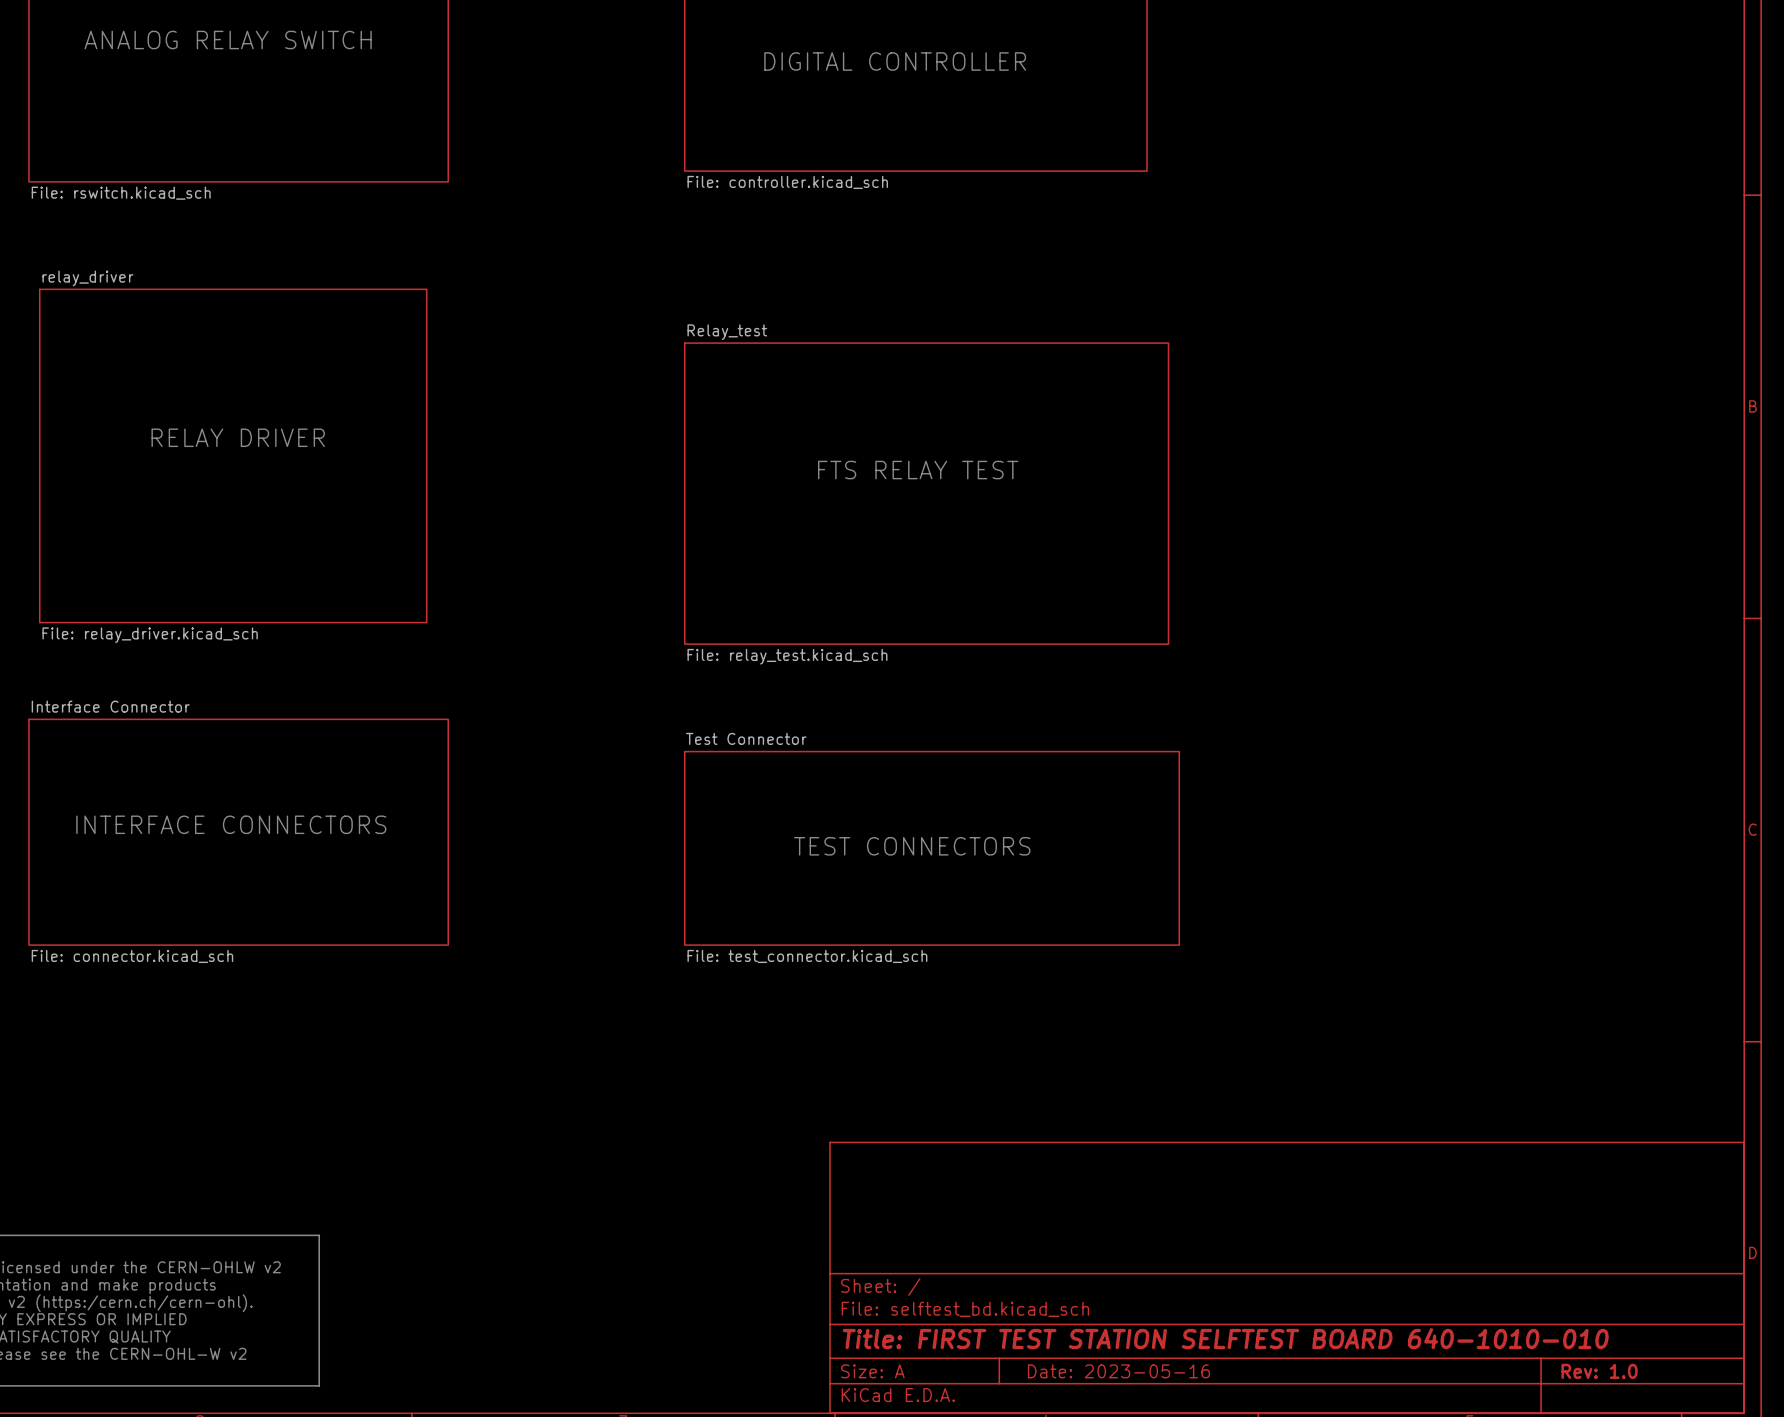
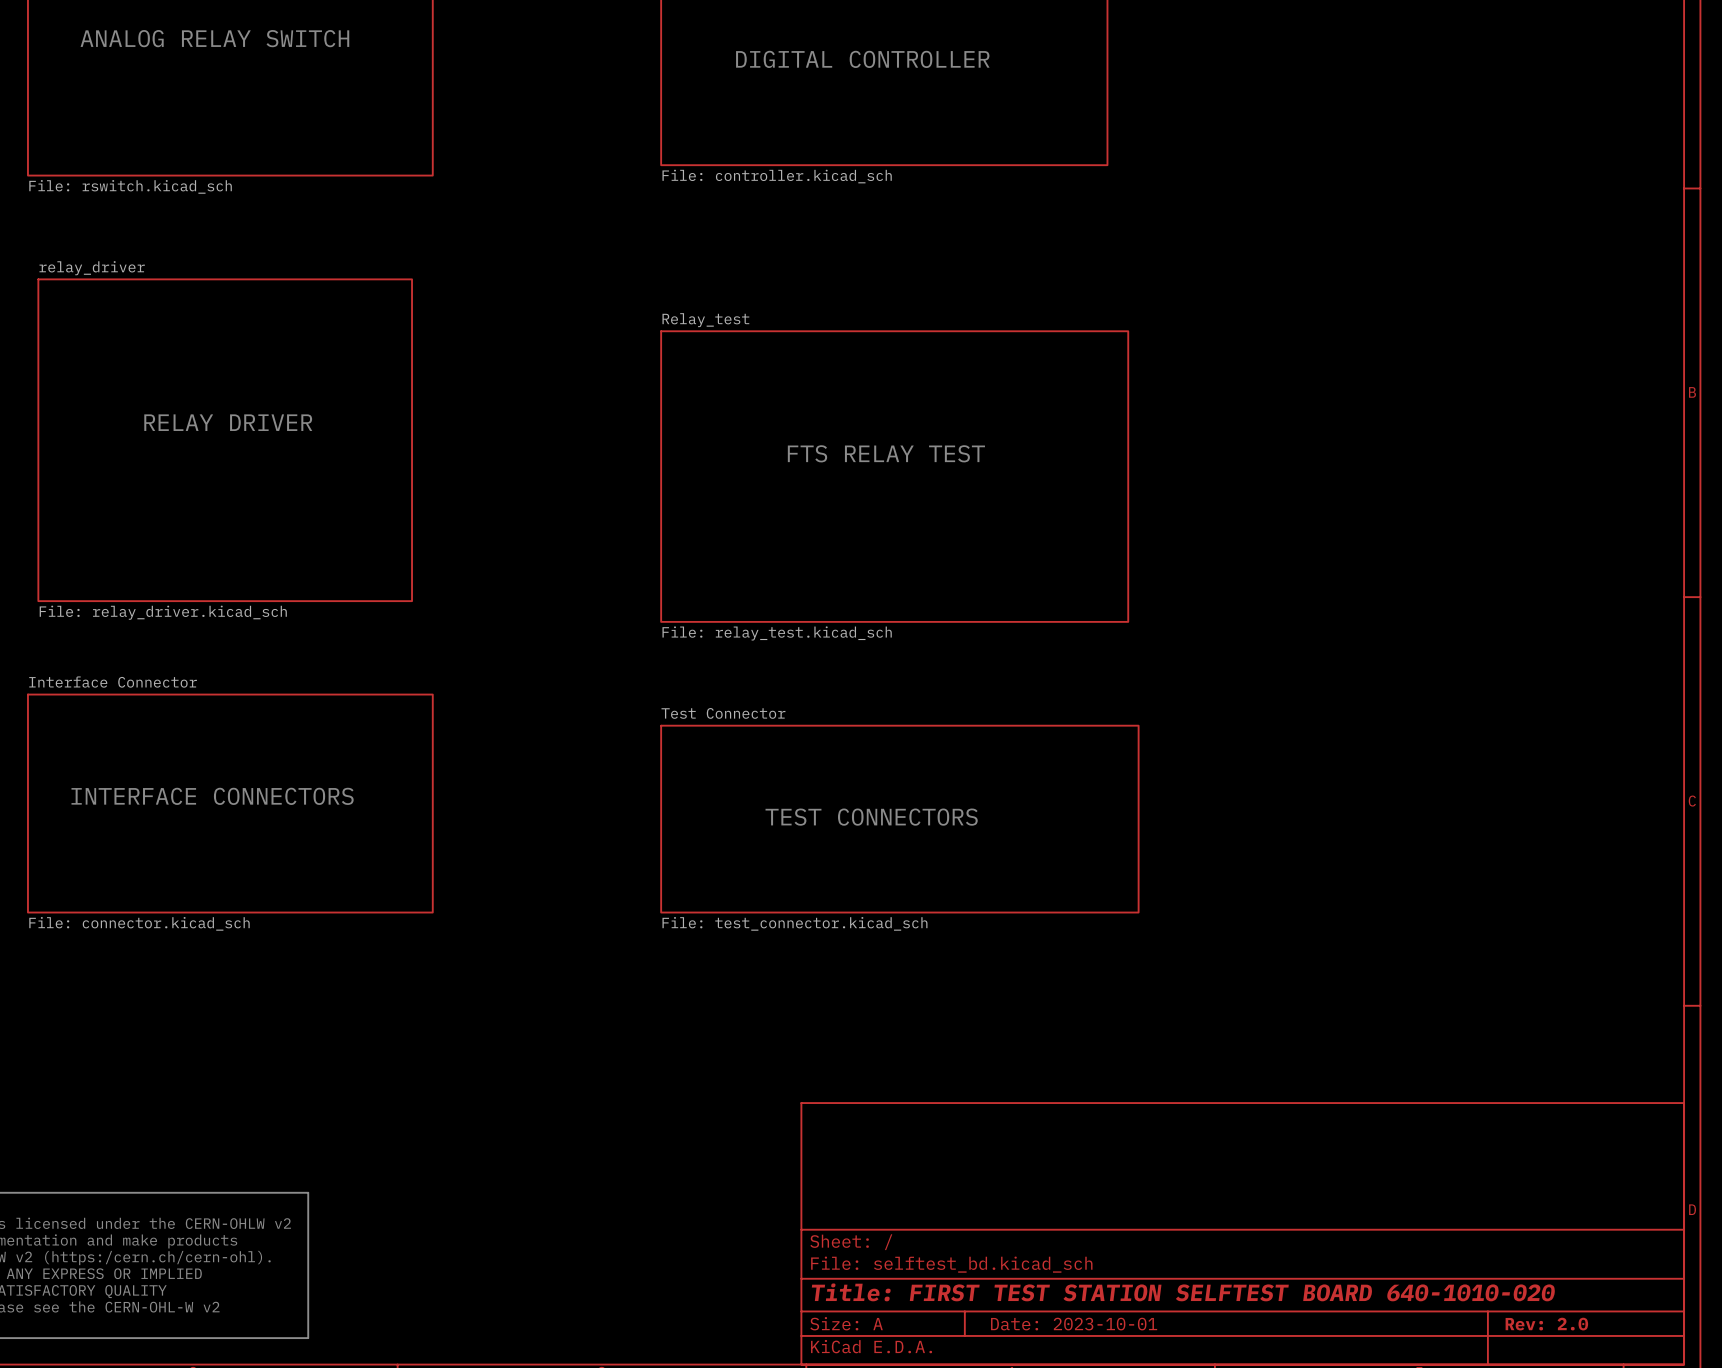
title block: Title: FIRST TEST STATION SELFTEST BOARD 640-1010-010 (1225, 1338) -> Title: FIRST TEST STATION SELFTEST BOARD 640-1010-020 (1183, 1292)
title block: Date: 2023-05-16 (1118, 1371) -> Date: 2023-10-01 (1074, 1324)
title block: Rev: 1.0 (1599, 1371) -> Rev: 2.0 (1546, 1324)

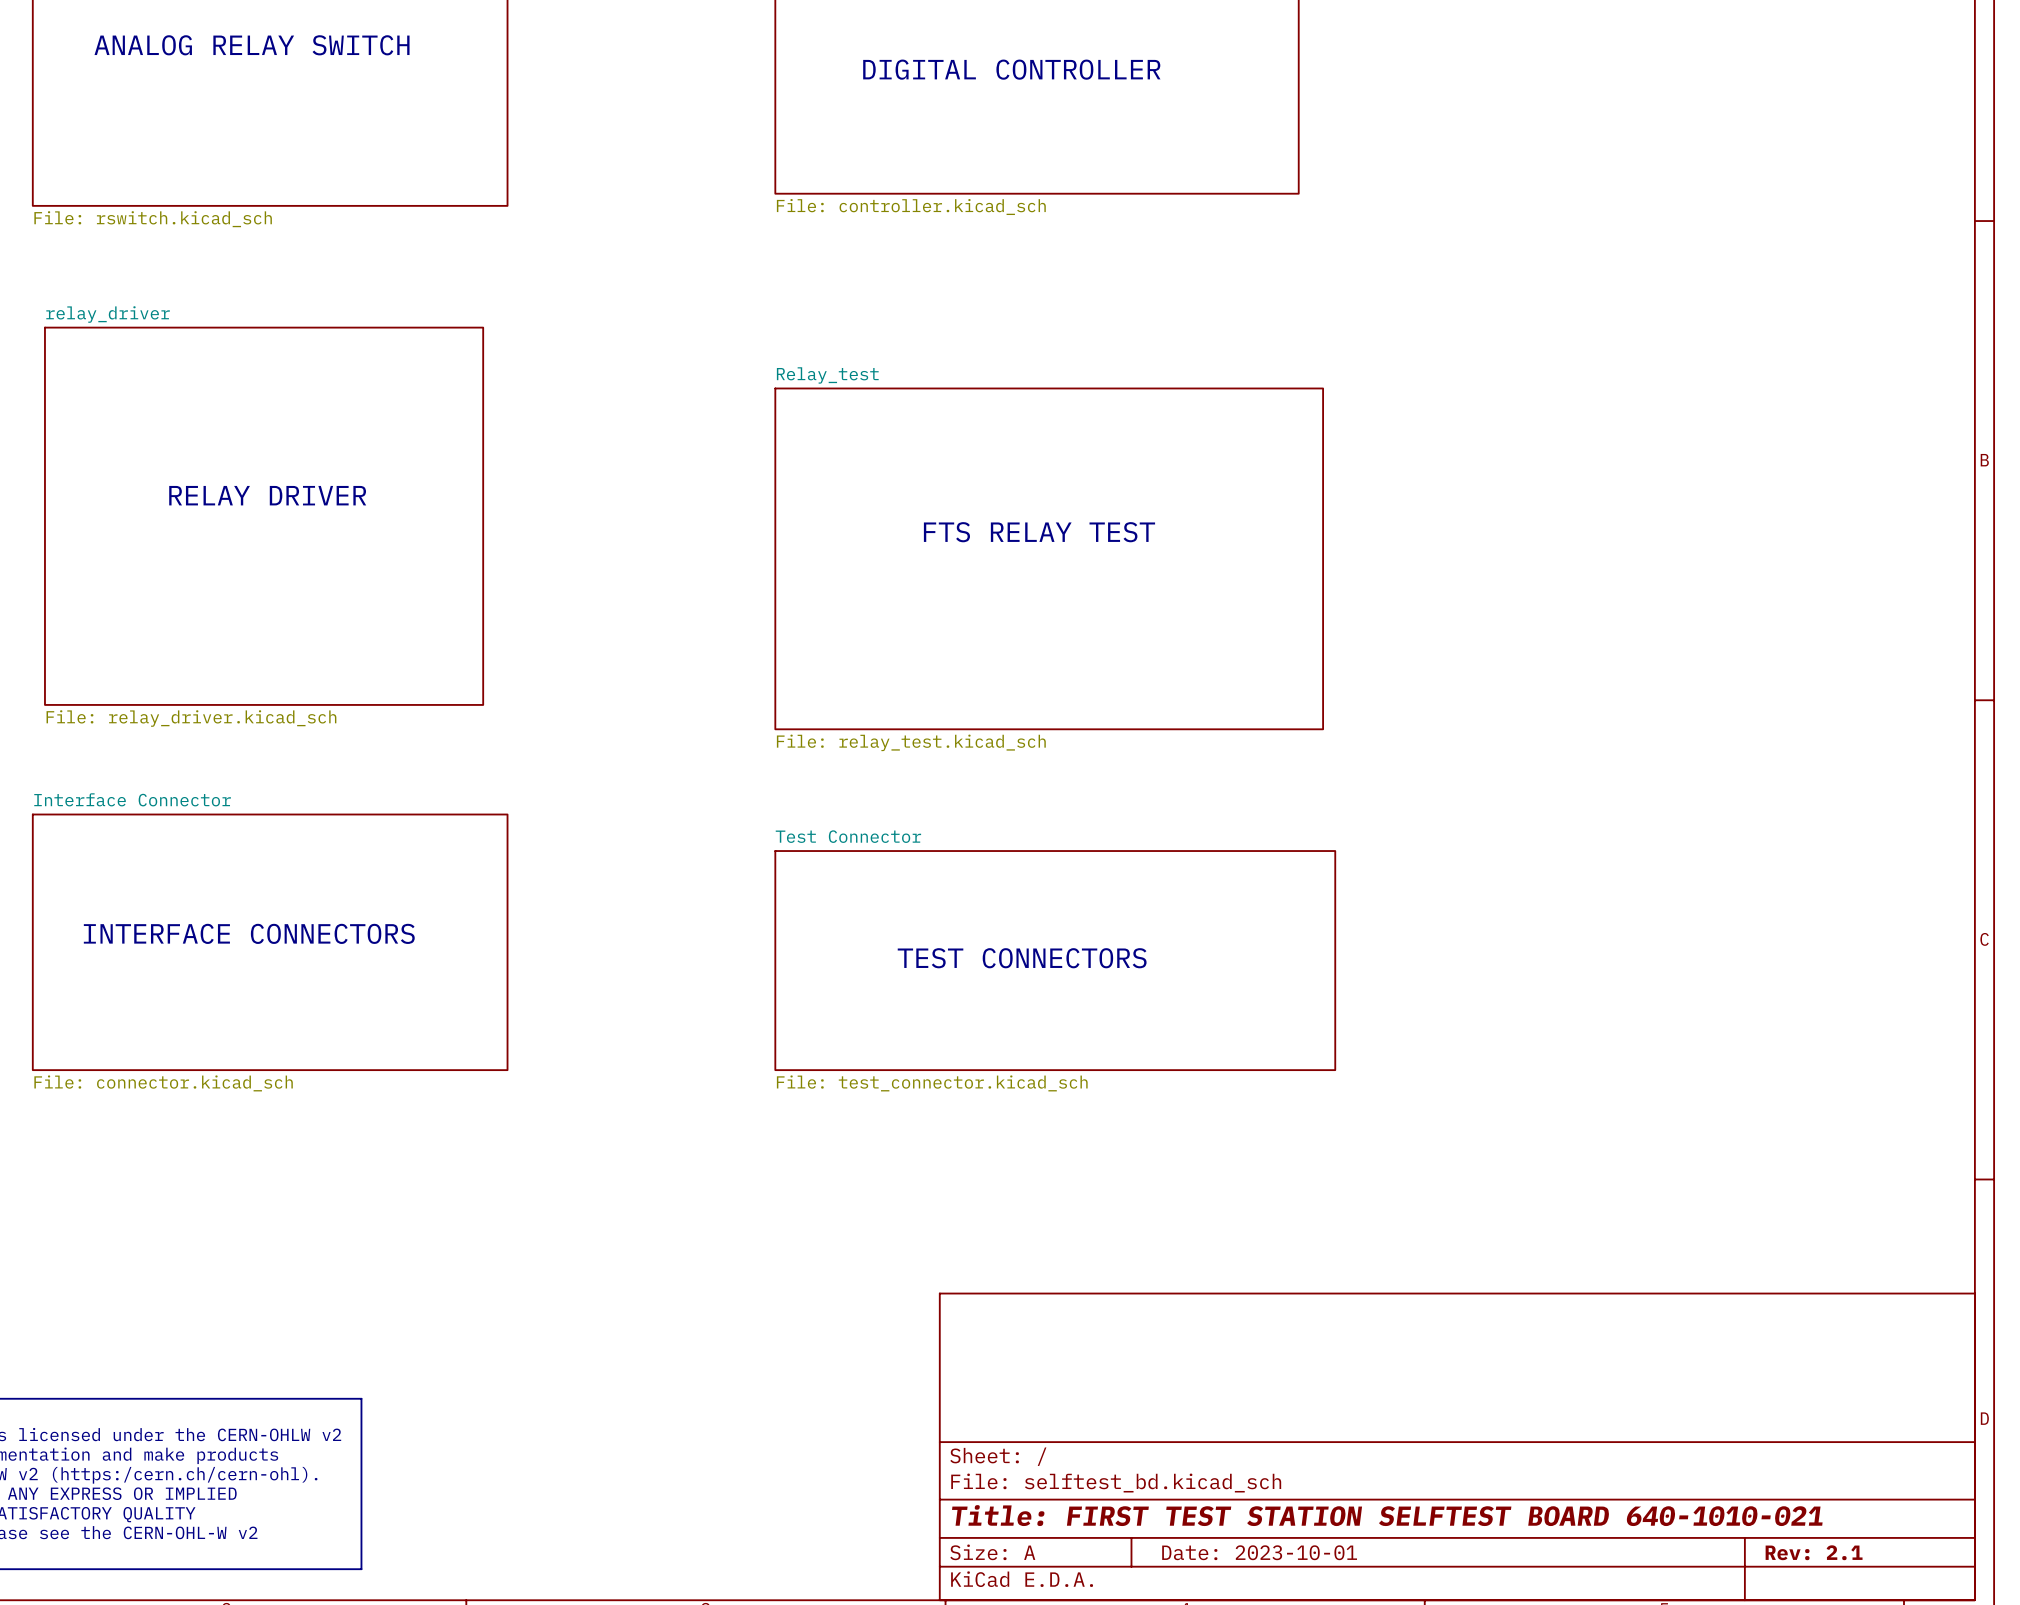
title block: Title: FIRST TEST STATION SELFTEST BOARD 640-1010-020 (1183, 1292) -> Title: FIRST TEST STATION SELFTEST BOARD 640-1010-021 (1387, 1515)
title block: Rev: 2.0 (1546, 1324) -> Rev: 2.1 (1814, 1552)

